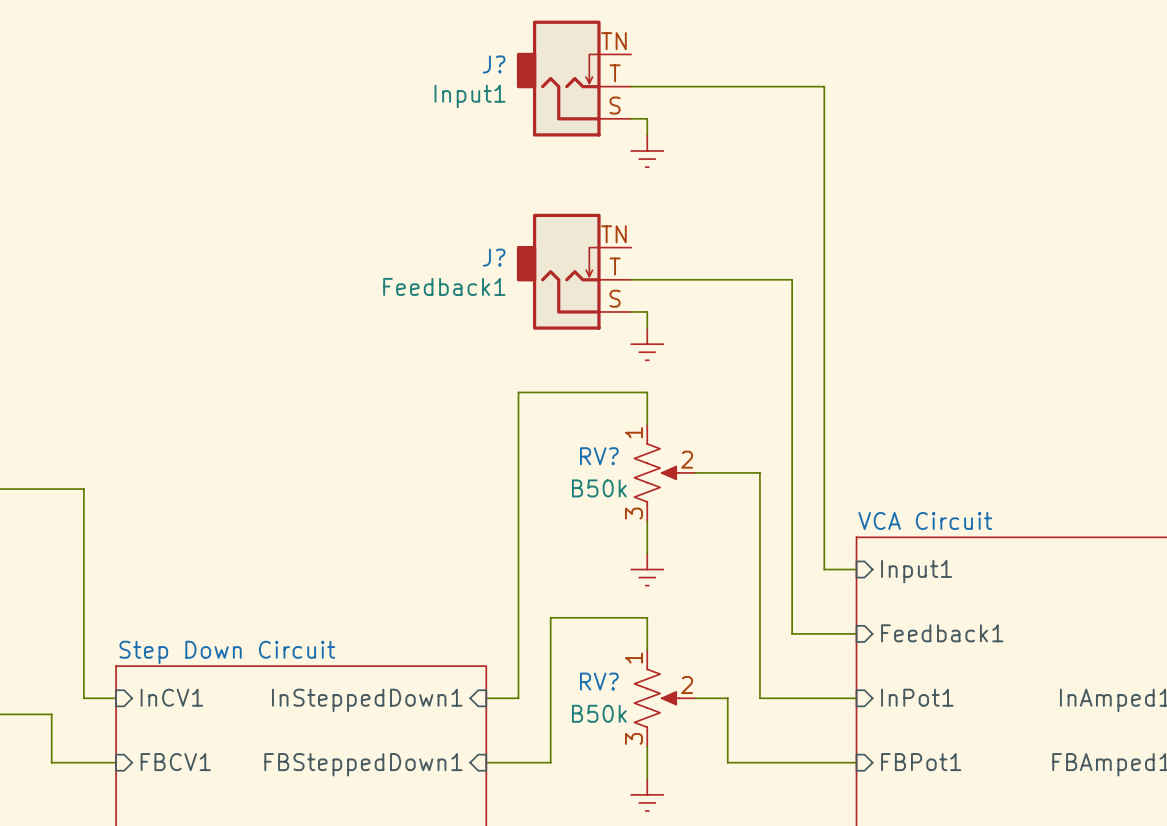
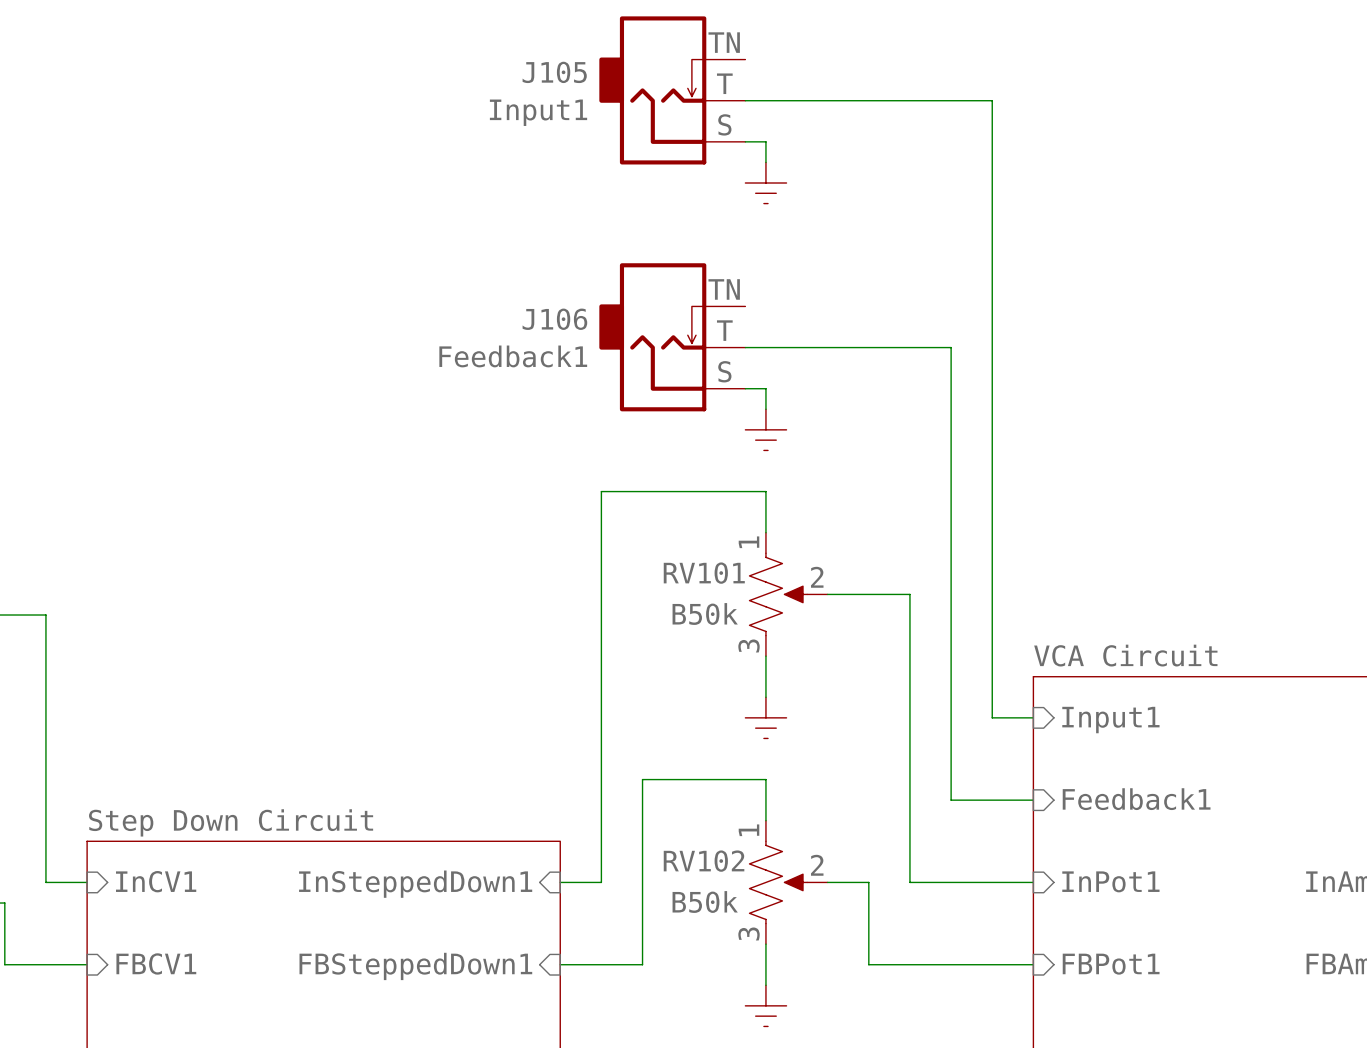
J? name: J? (494, 64) -> J105 (554, 72)
J? name: J? (494, 257) -> J106 (554, 319)
RV? name: RV? (599, 456) -> RV101 (704, 573)
RV? name: RV? (599, 681) -> RV102 (704, 861)

